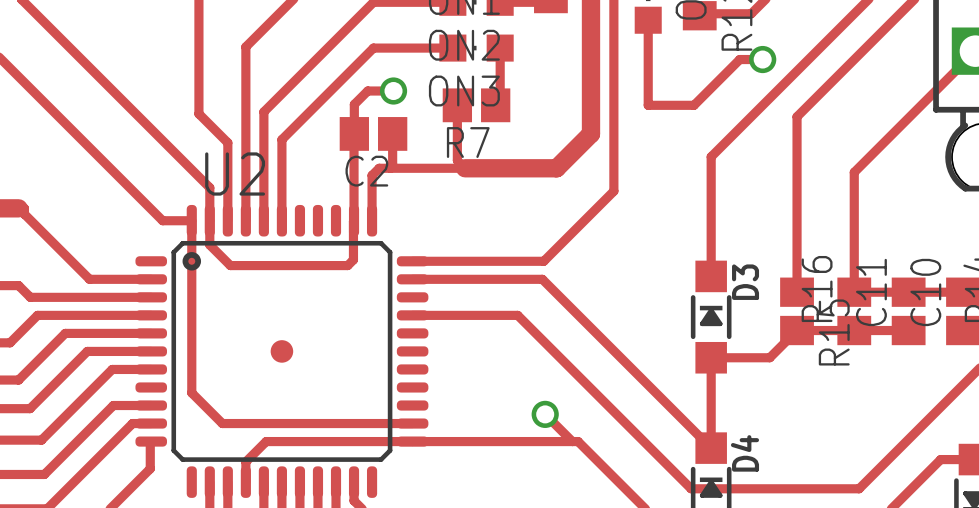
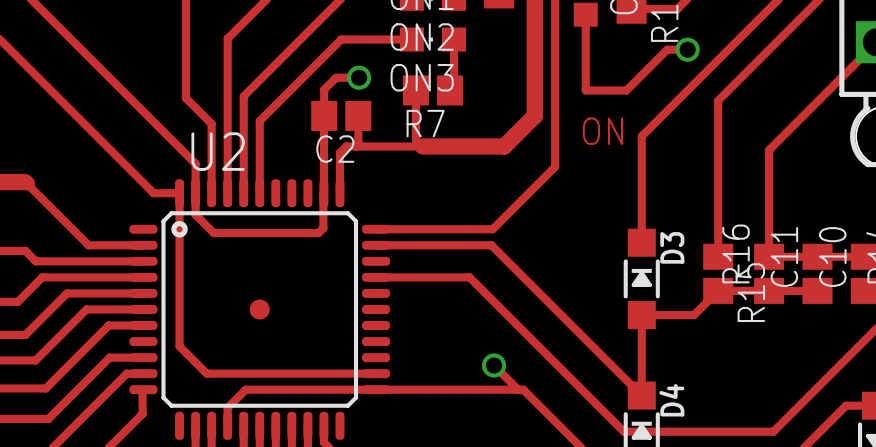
text: none -> ON (602, 131)

